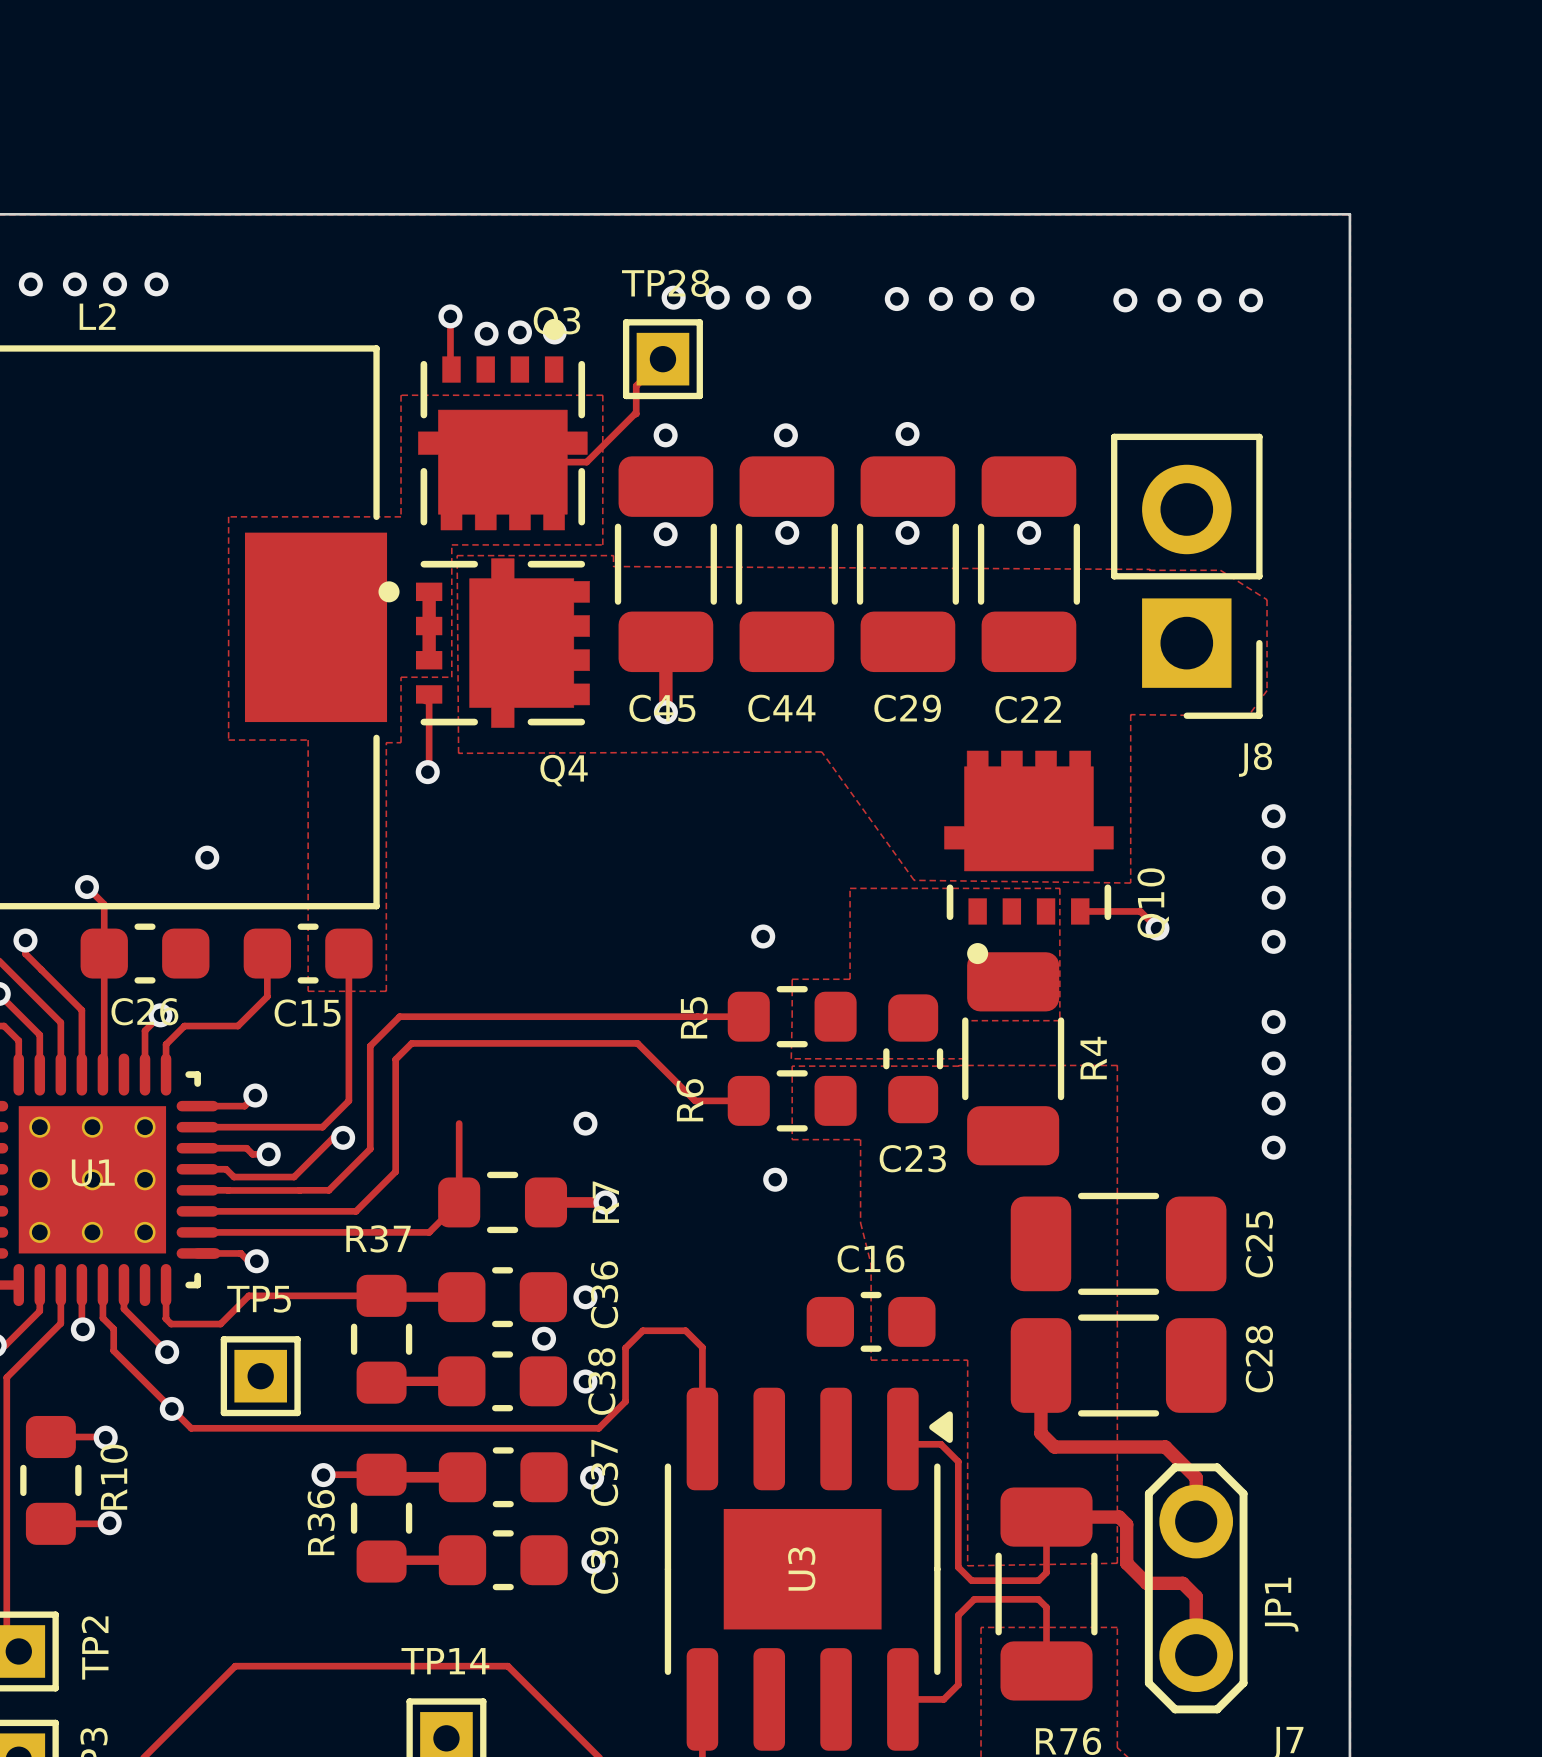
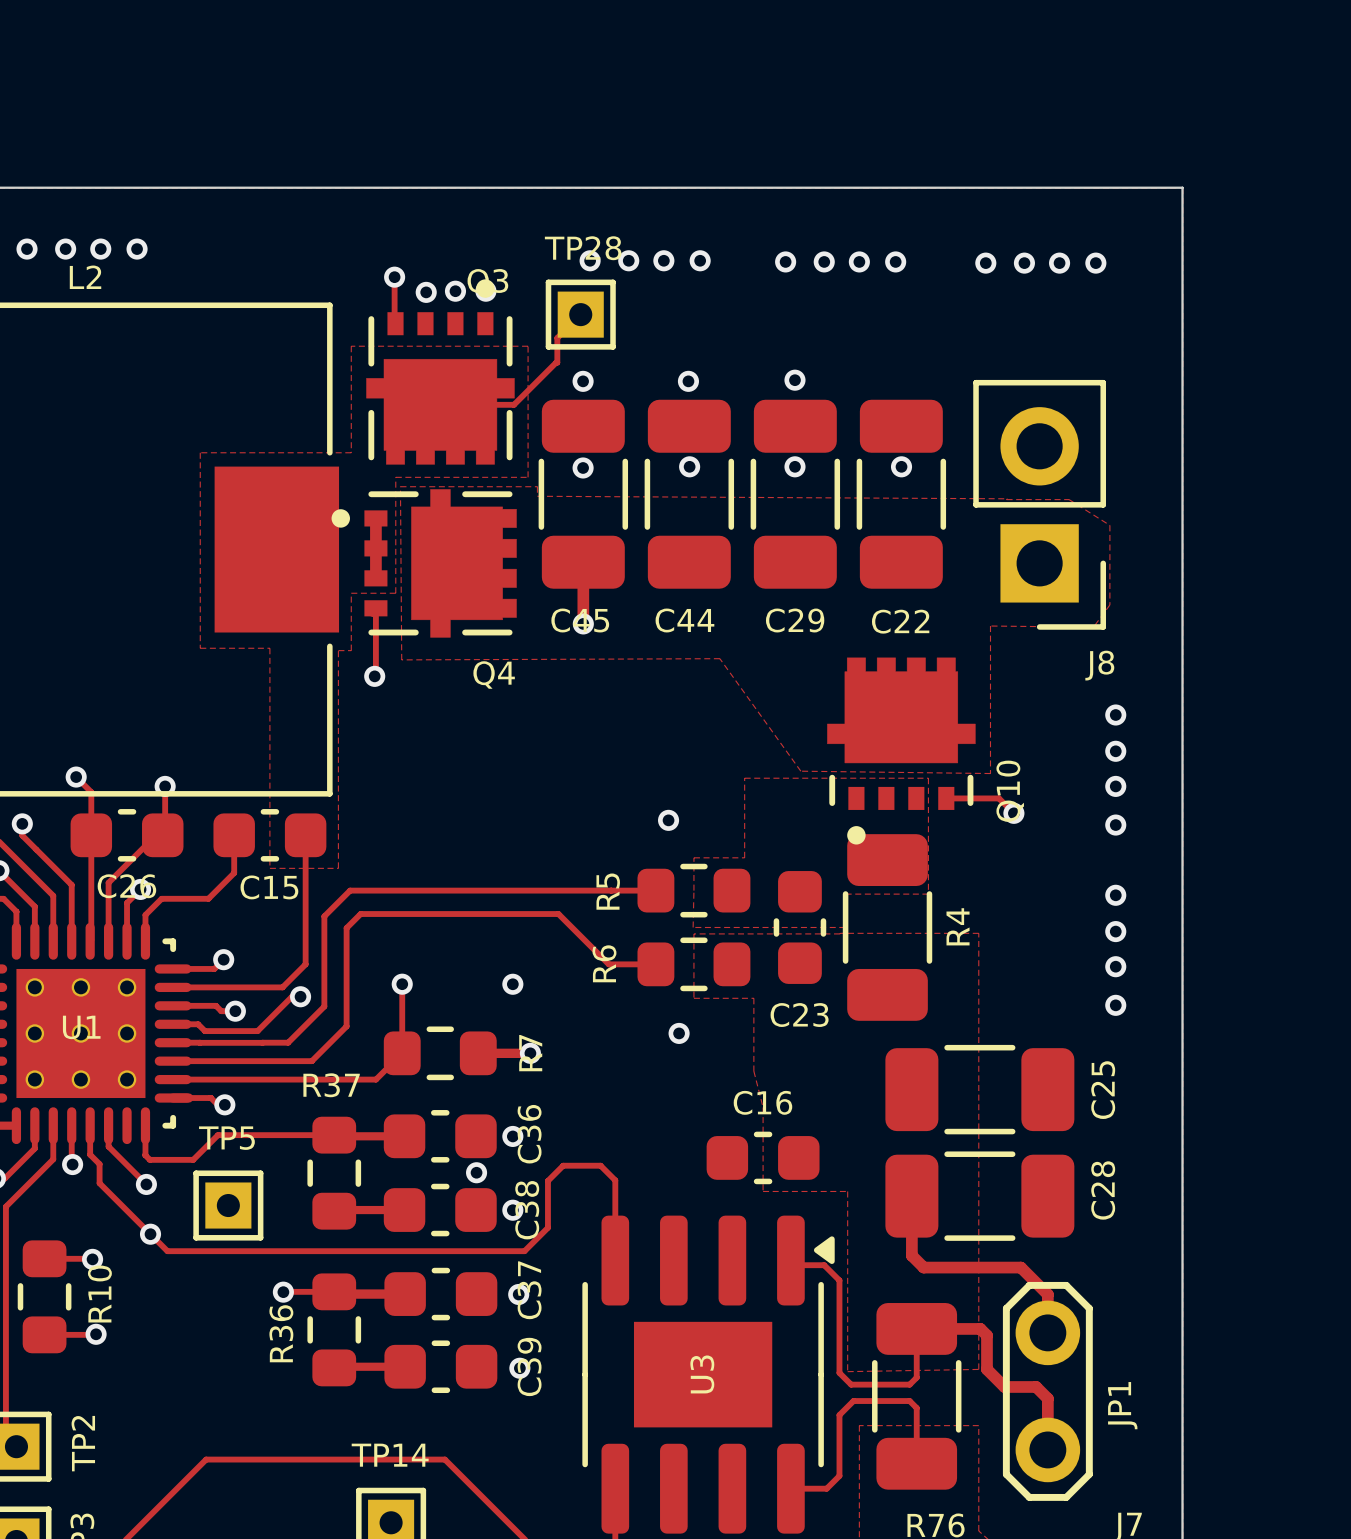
via position: (207, 857) -> (165, 786)
track: none -> (165, 786) (165, 826) (108, 882) (108, 941)
via: none -> (402, 984)

